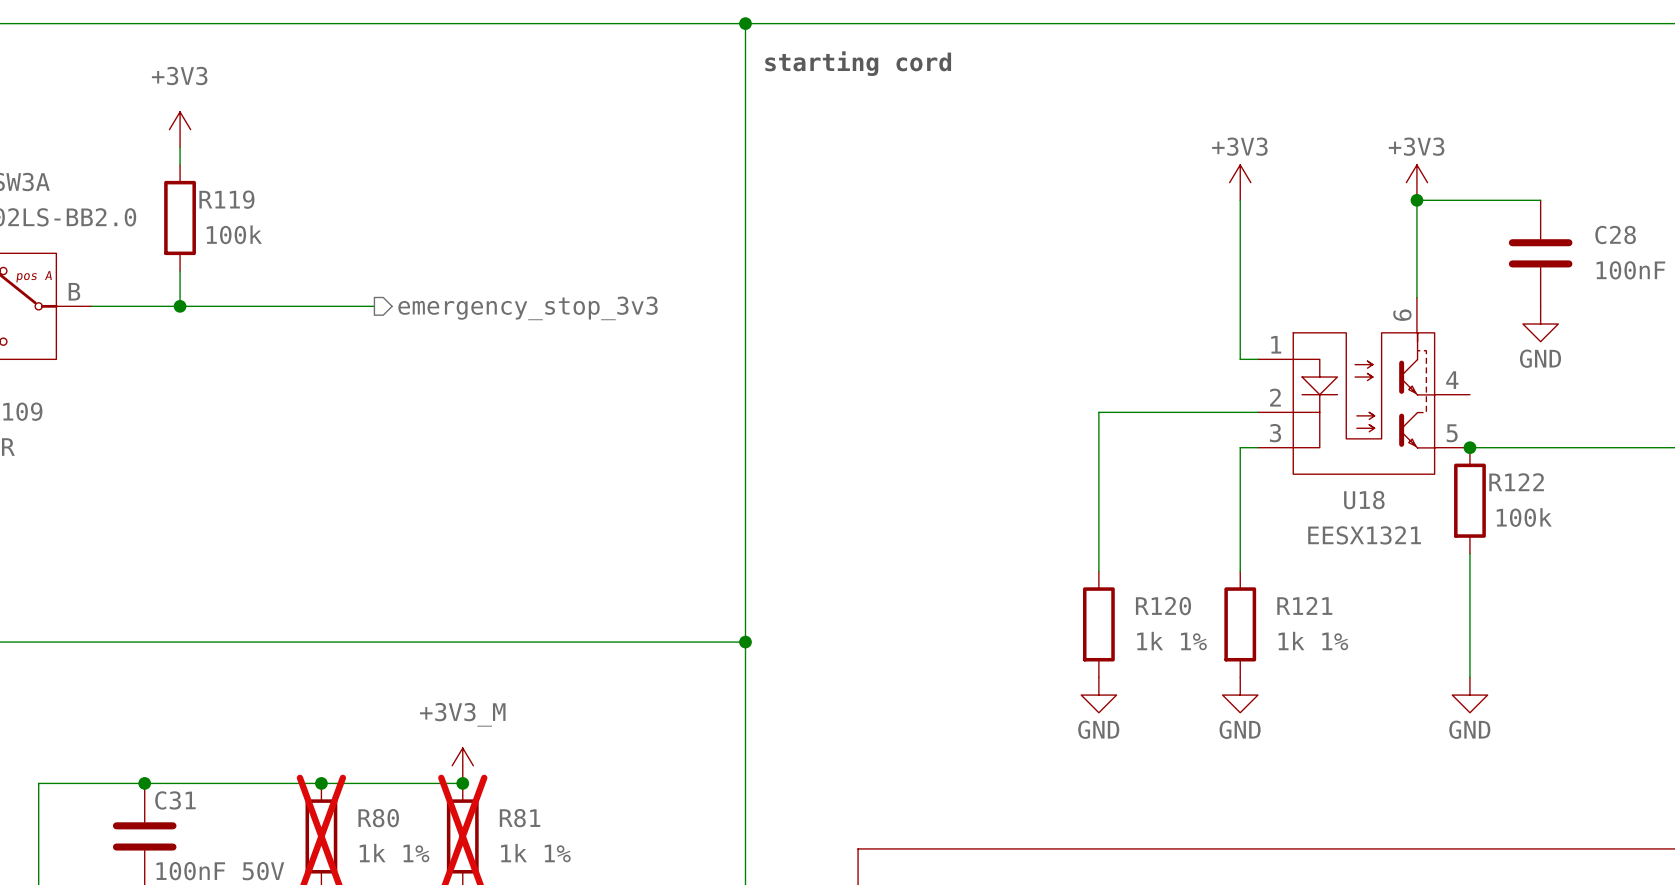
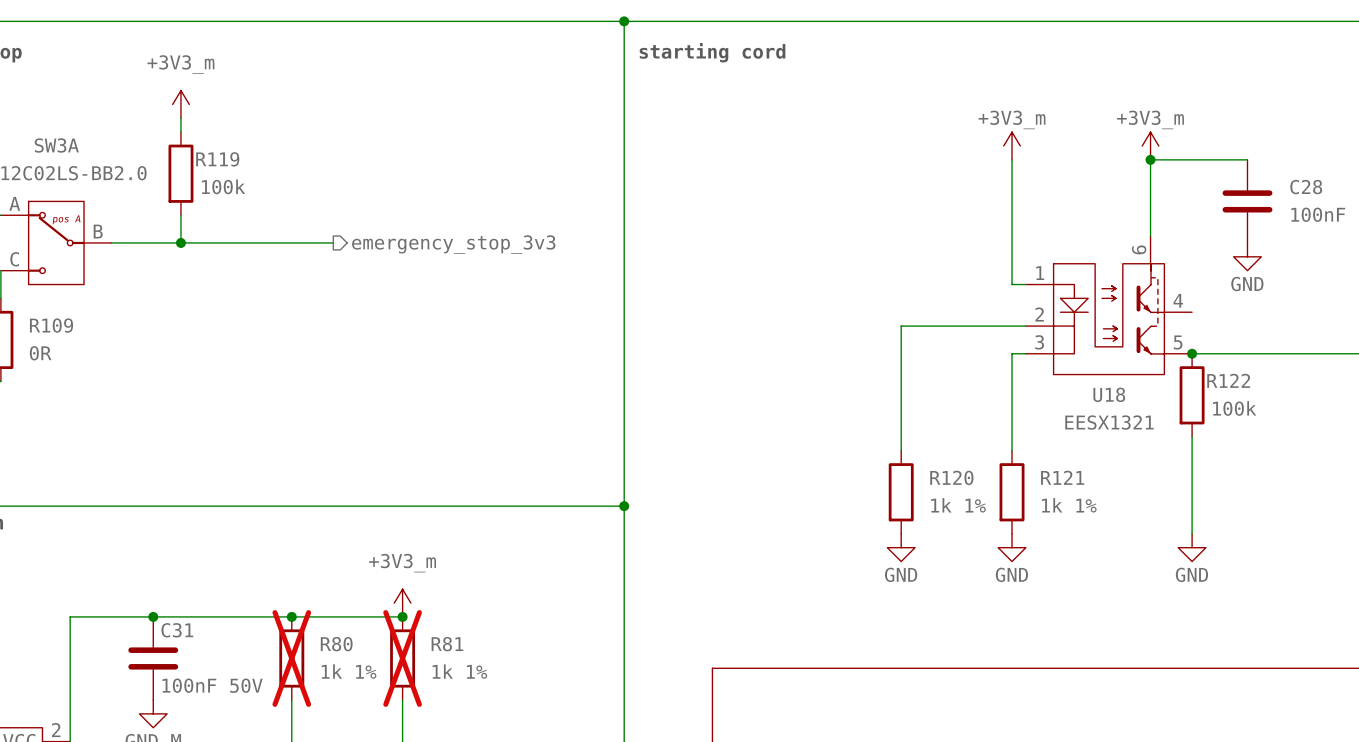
power symbol: +3V3 (180, 129) -> +3V3_m (180, 104)
power symbol: +3V3 (1240, 182) -> +3V3_m (1012, 146)
power symbol: +3V3 (1416, 182) -> +3V3_m (1150, 146)
power symbol: +3V3_M (462, 765) -> +3V3_m (402, 603)

